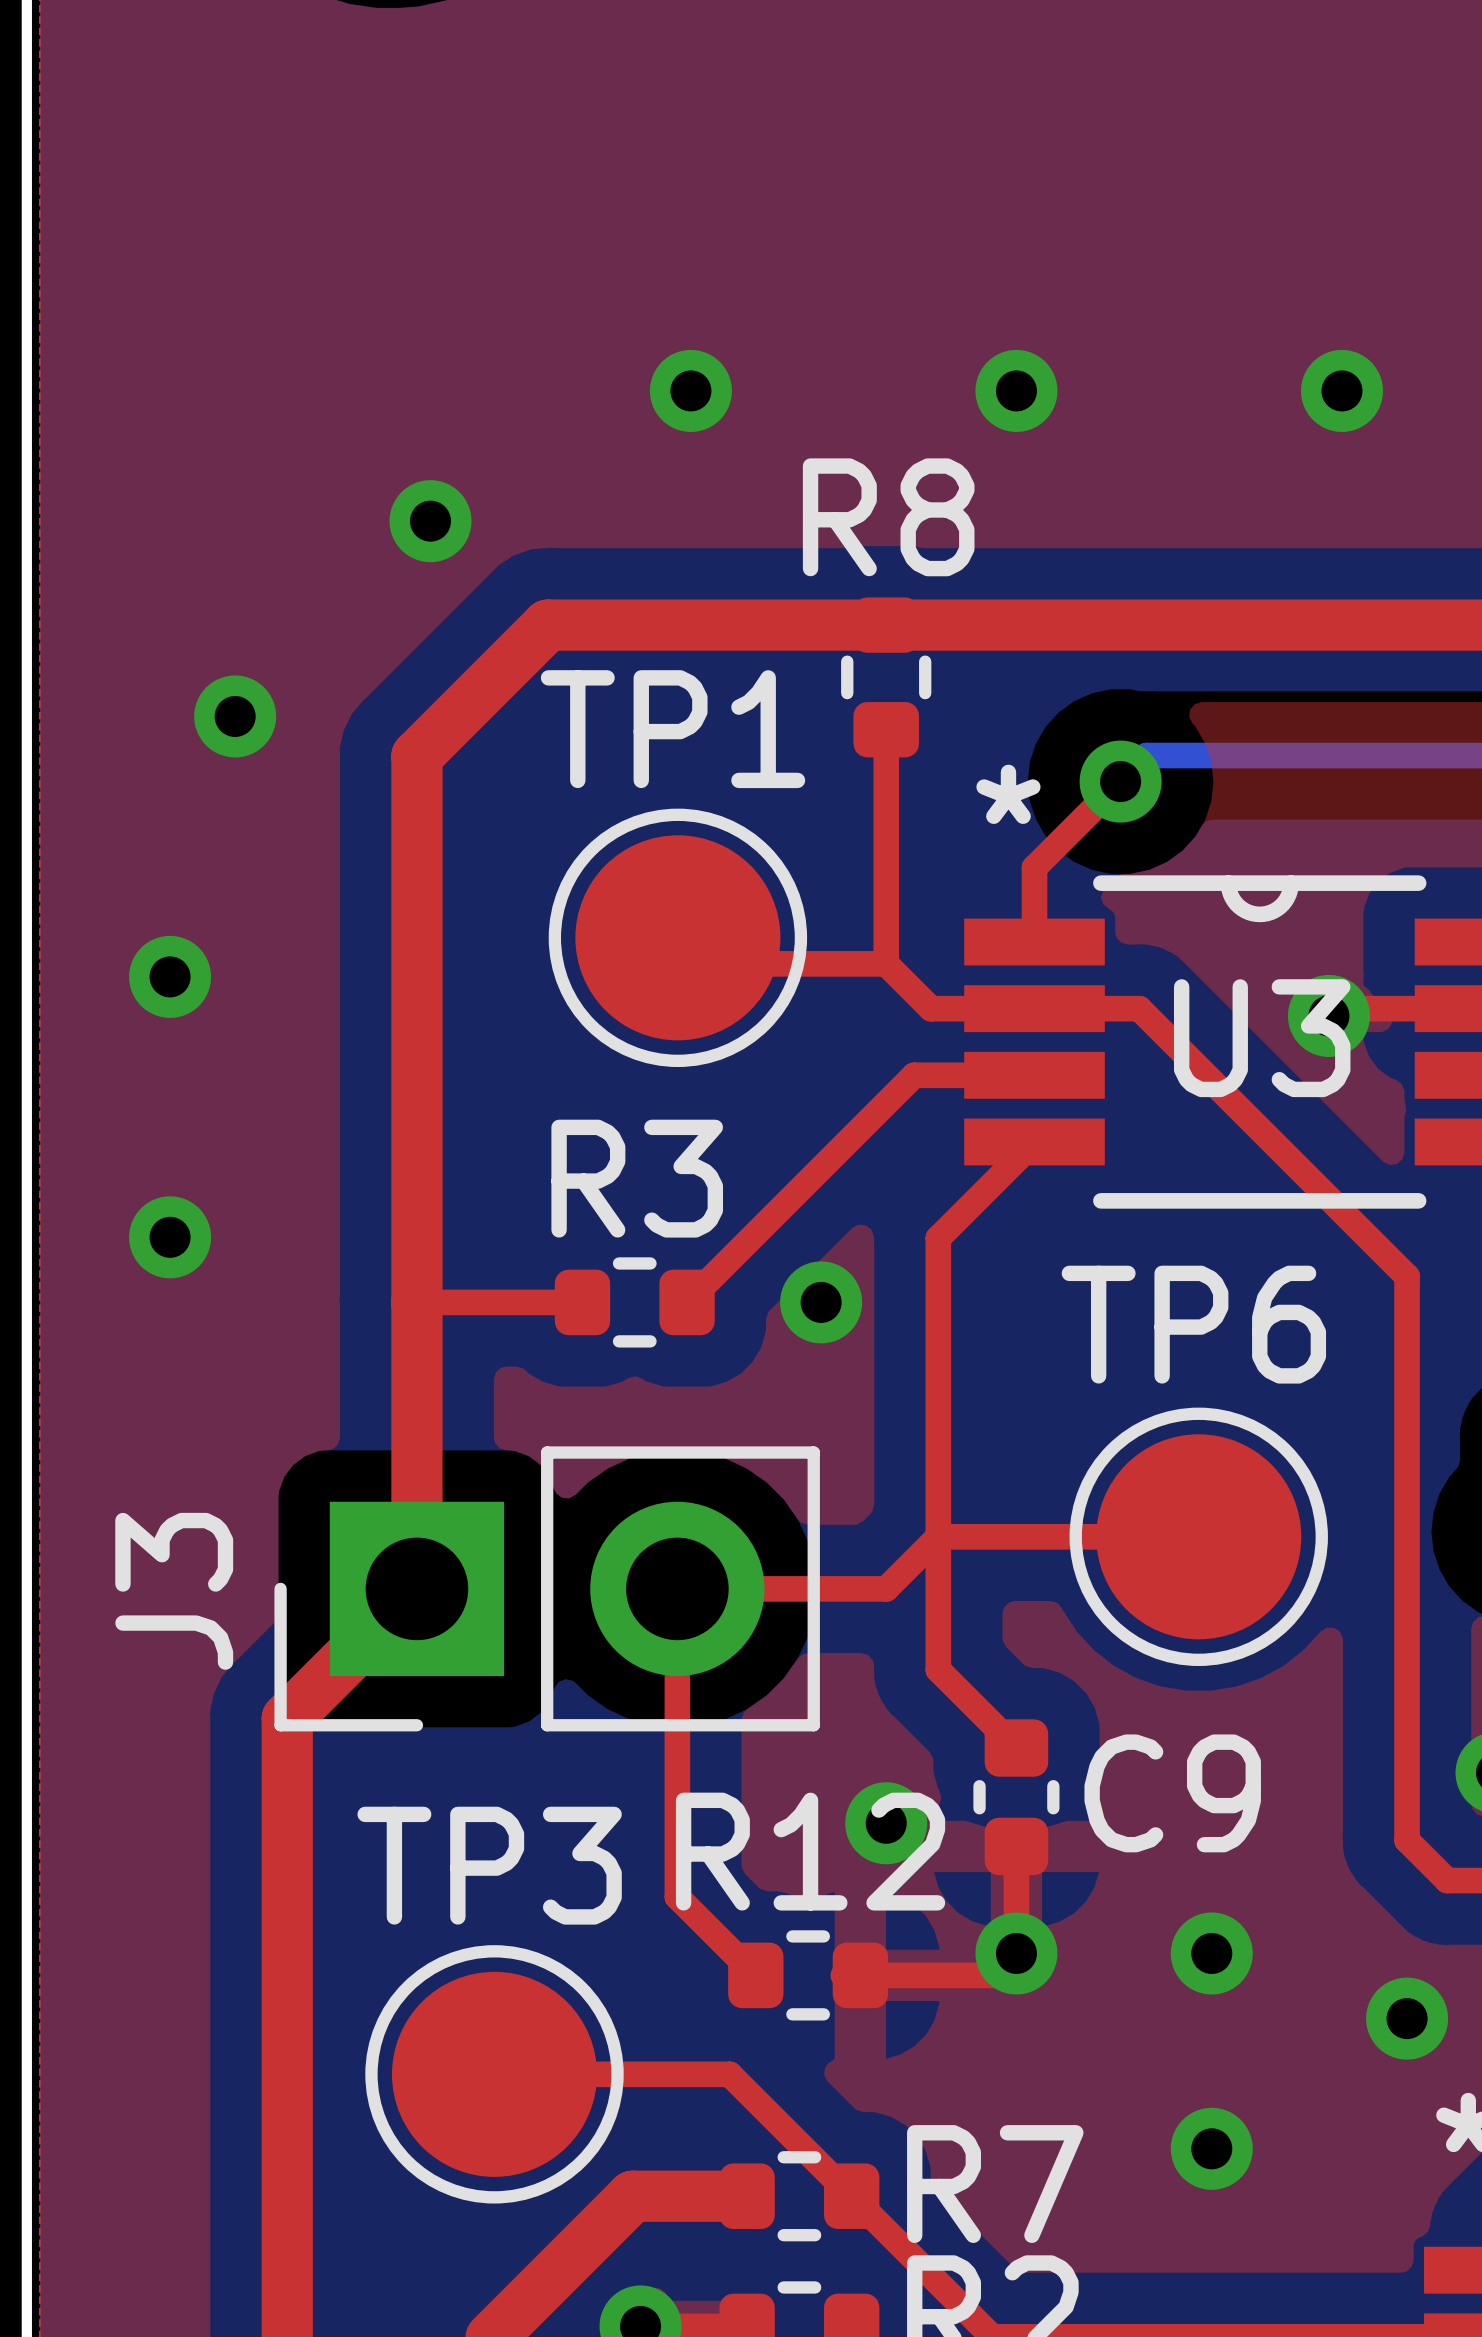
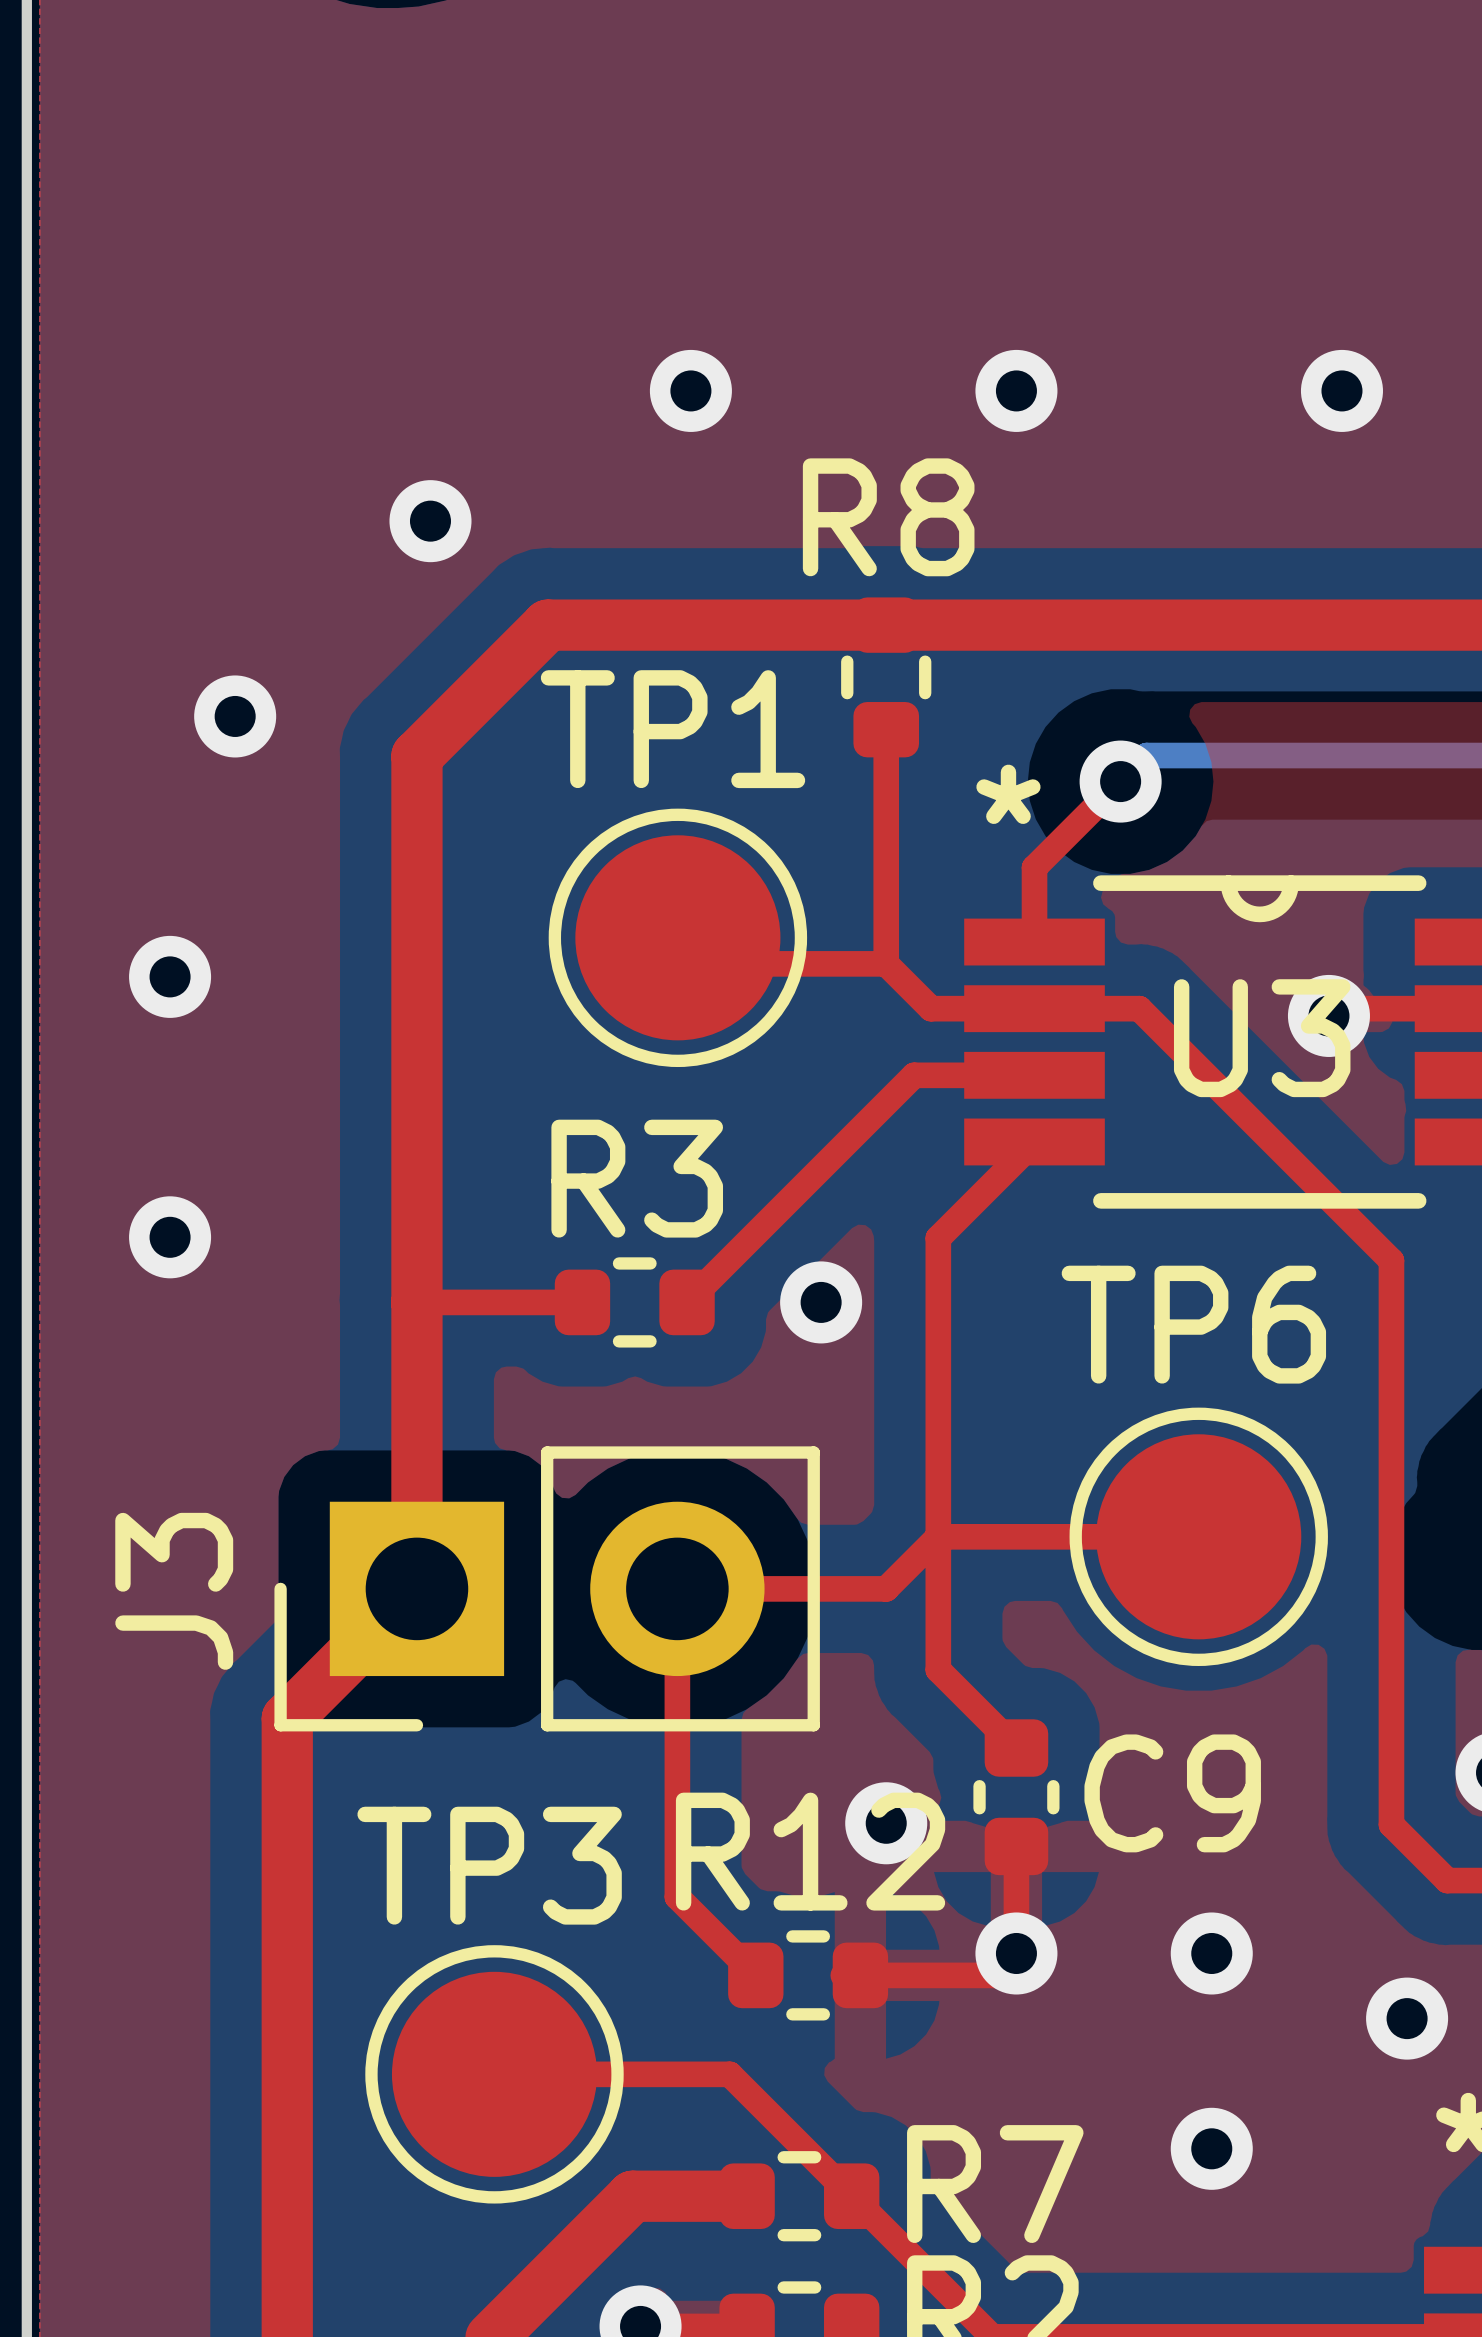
top track: (1391, 1260) (1407, 1276) (1407, 1840) -> (1391, 1260) (1391, 1824) (1407, 1840)

